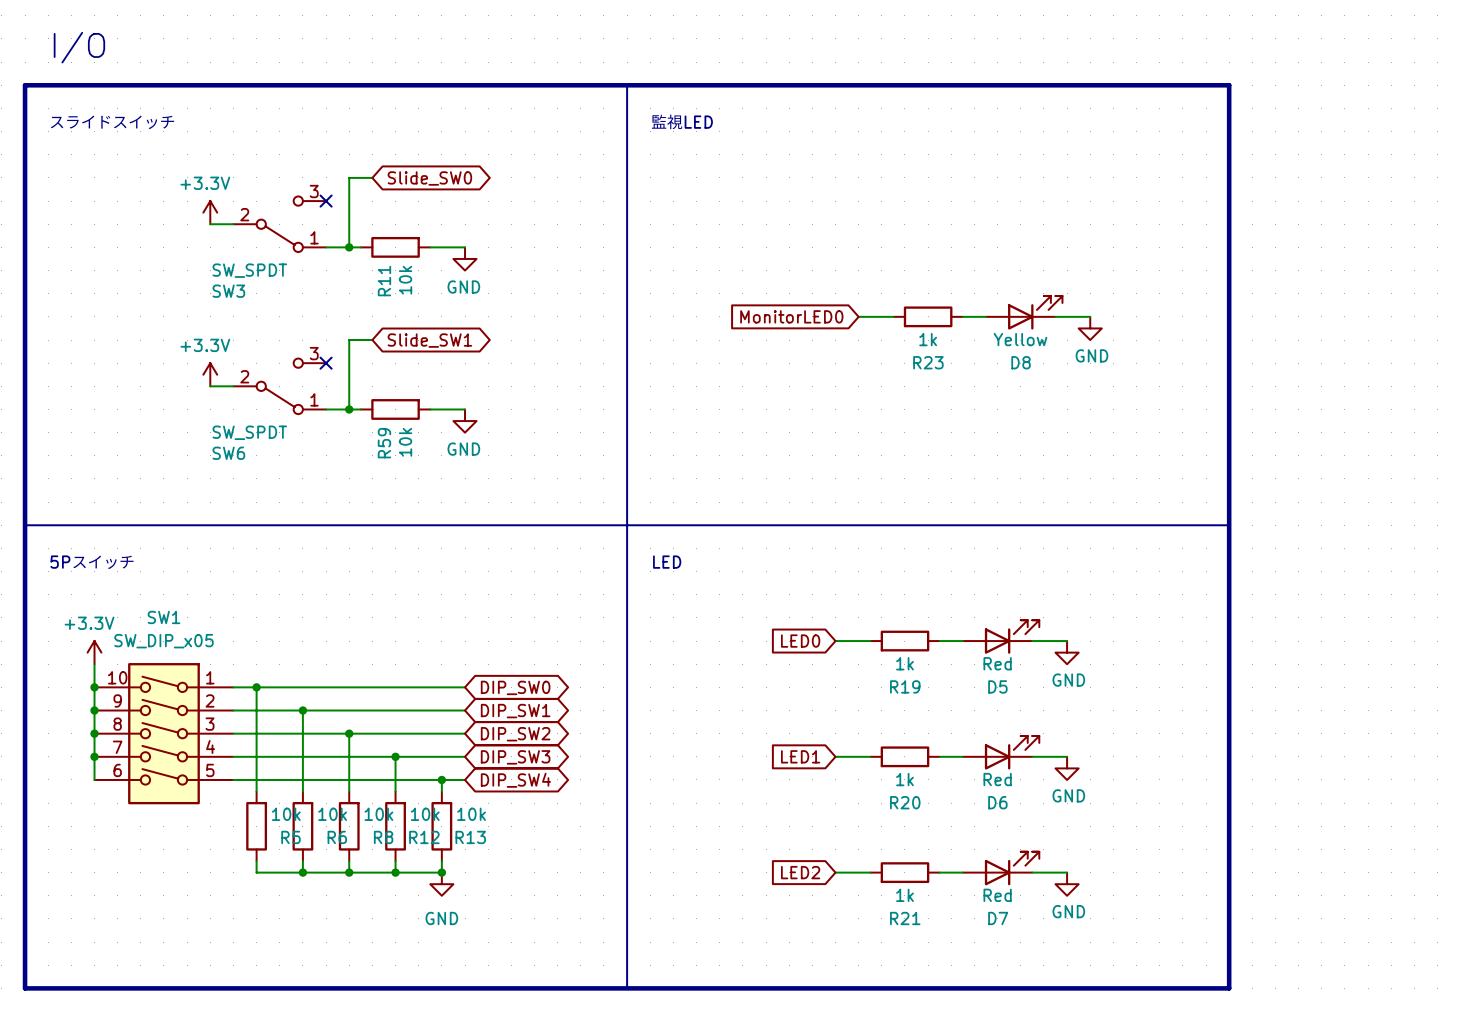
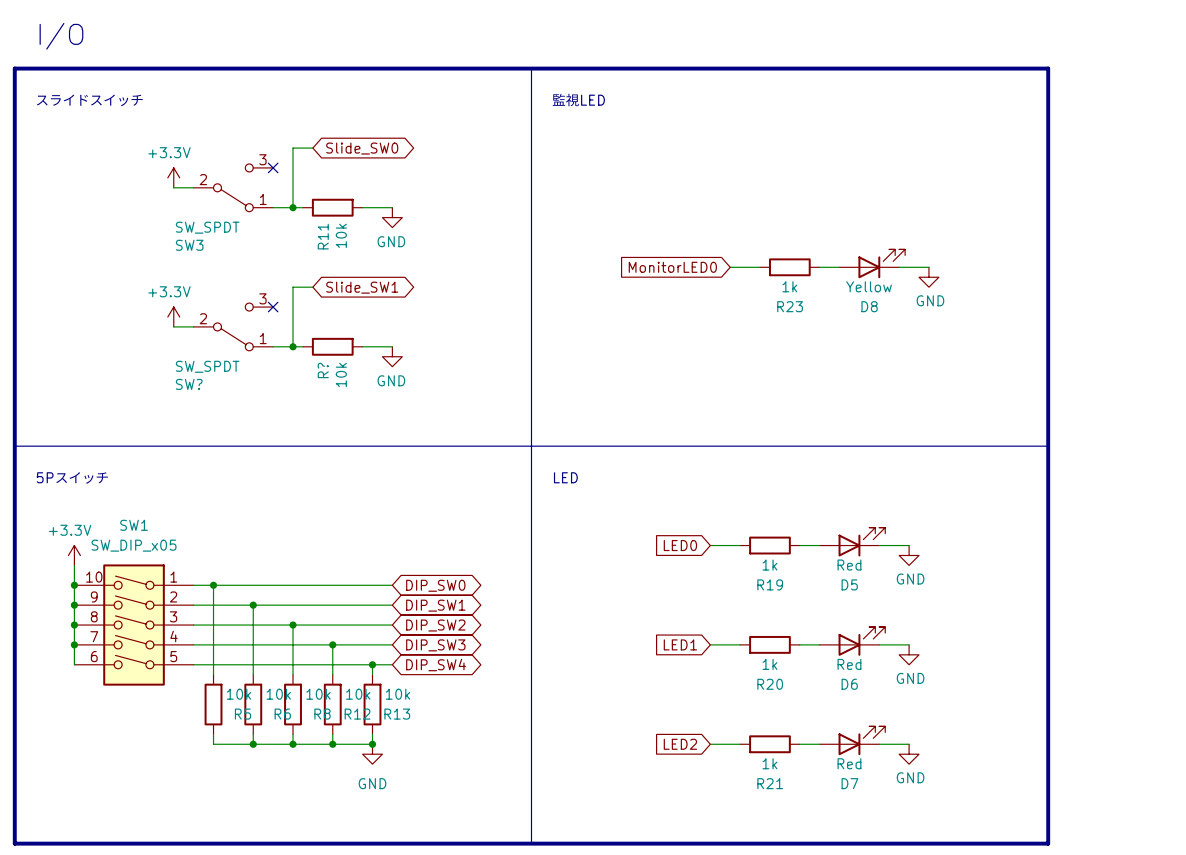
R59 name: R59 (384, 443) -> R? (323, 370)
SW6 name: SW6 (228, 453) -> SW? (189, 384)

